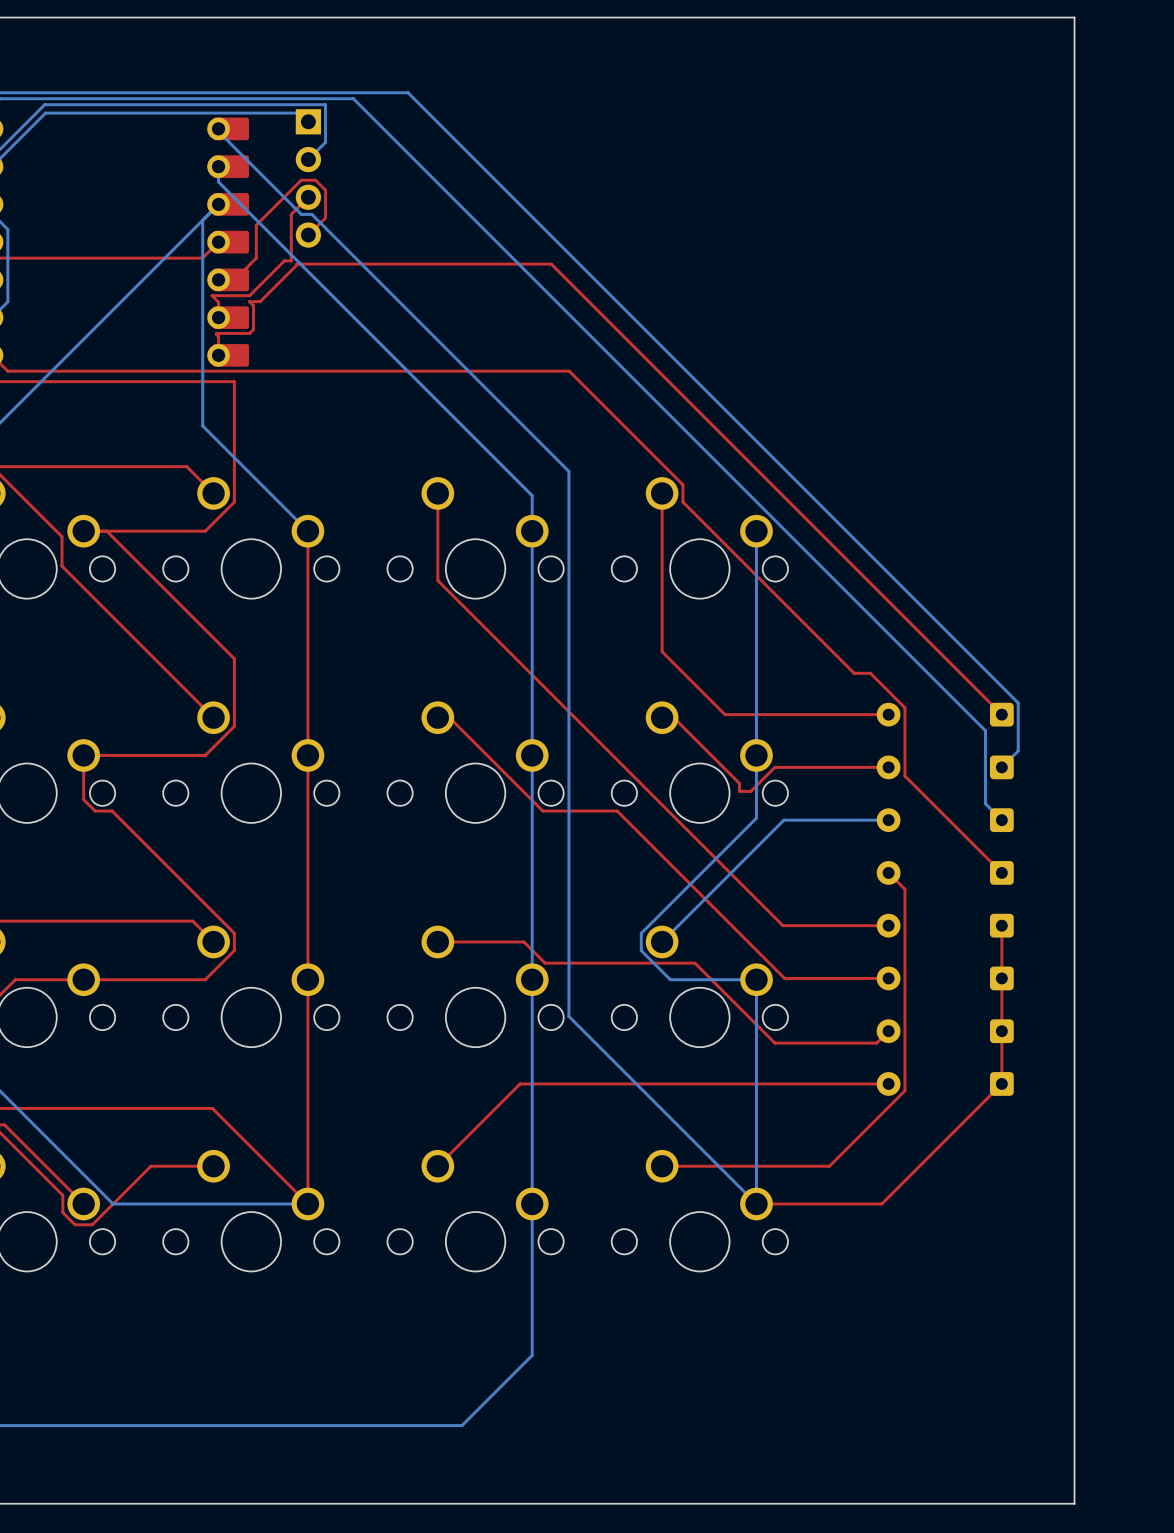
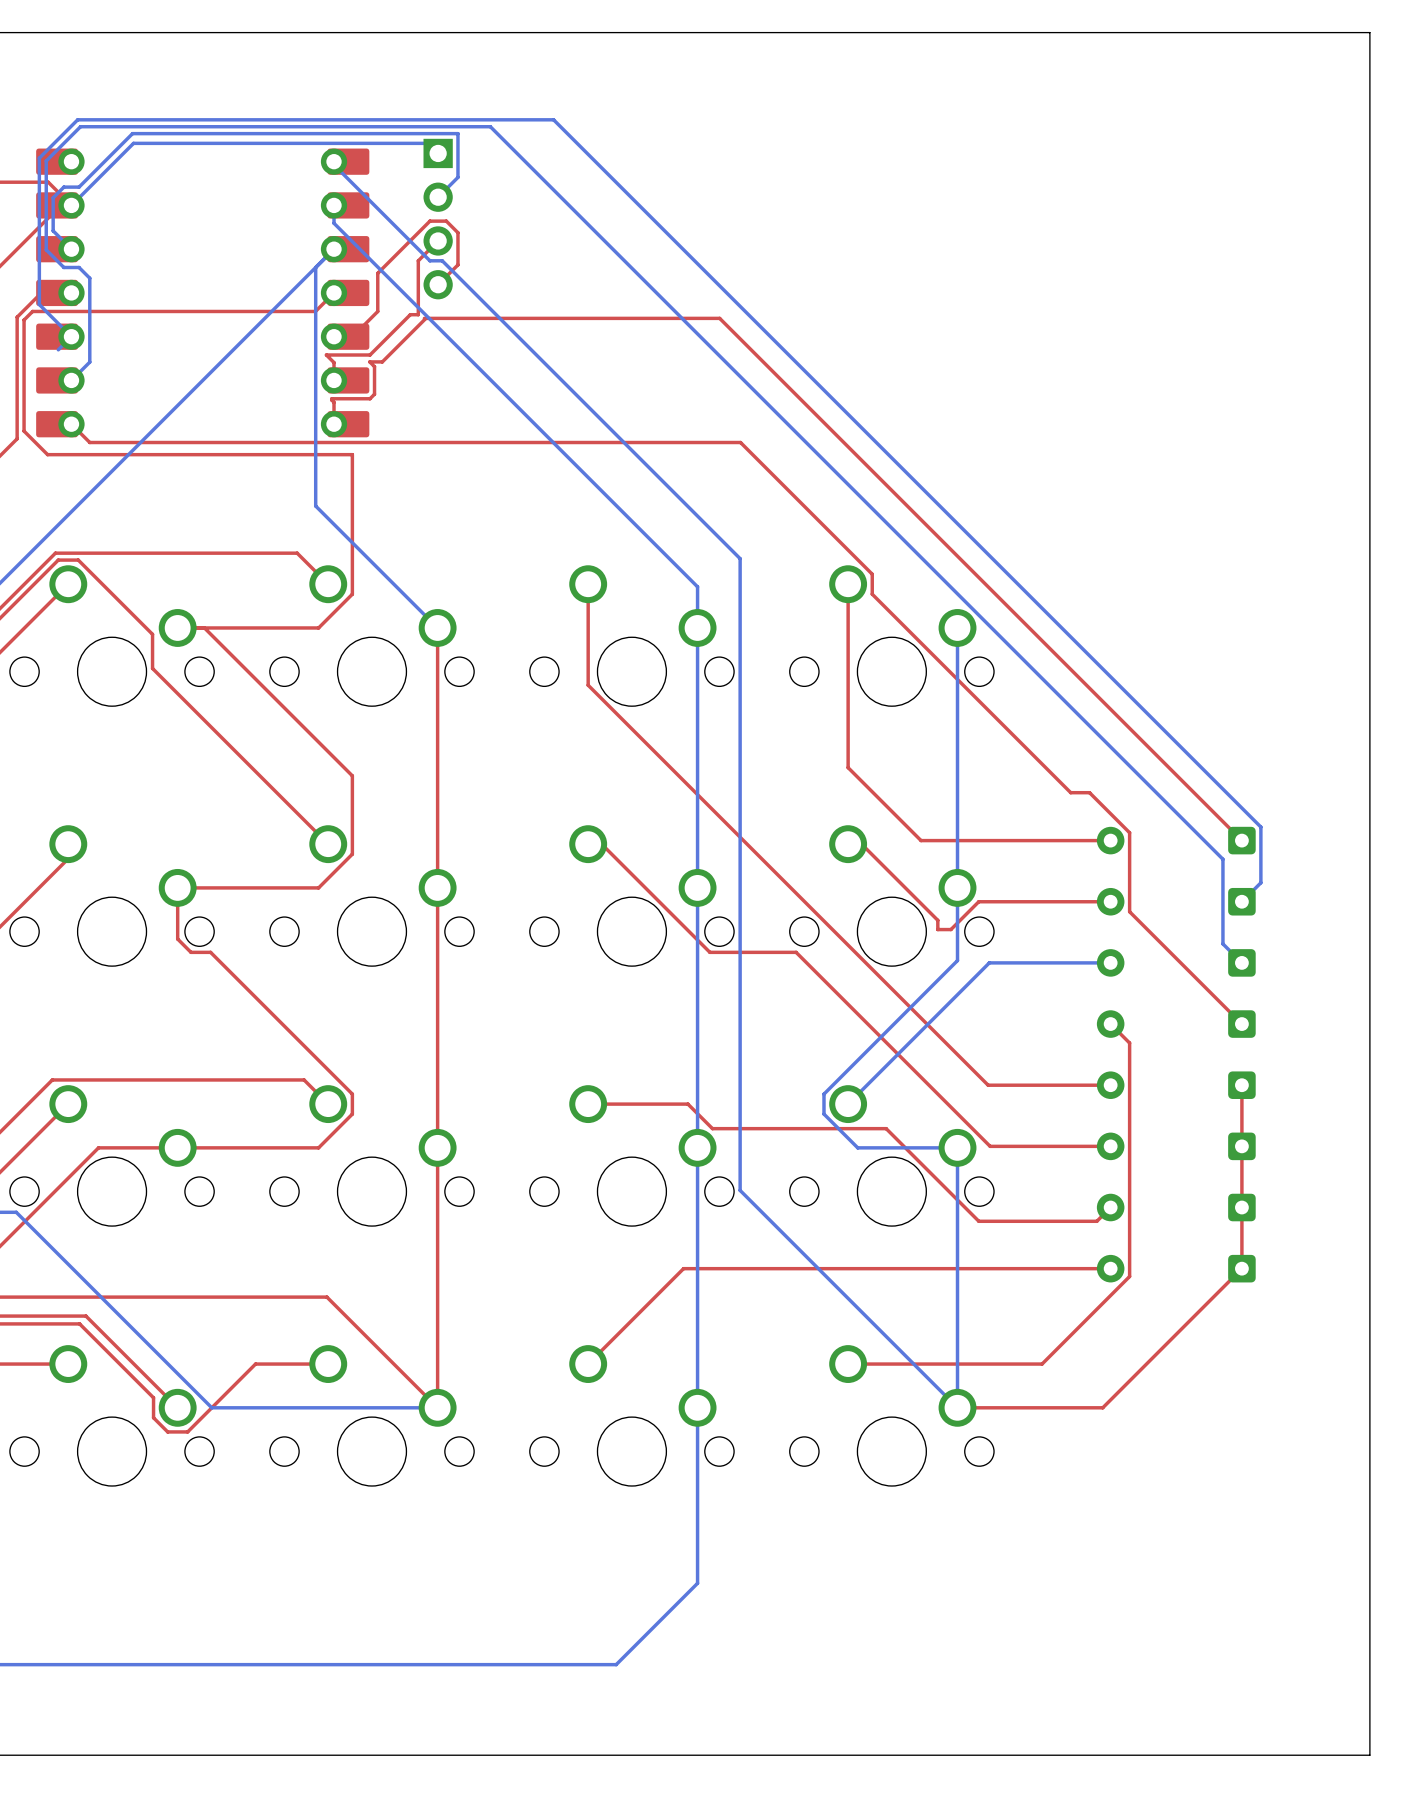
board edge: (1074, 17) (1074, 1503) -> (1326, 32) (1369, 32) (1369, 1755) (1326, 1755)

